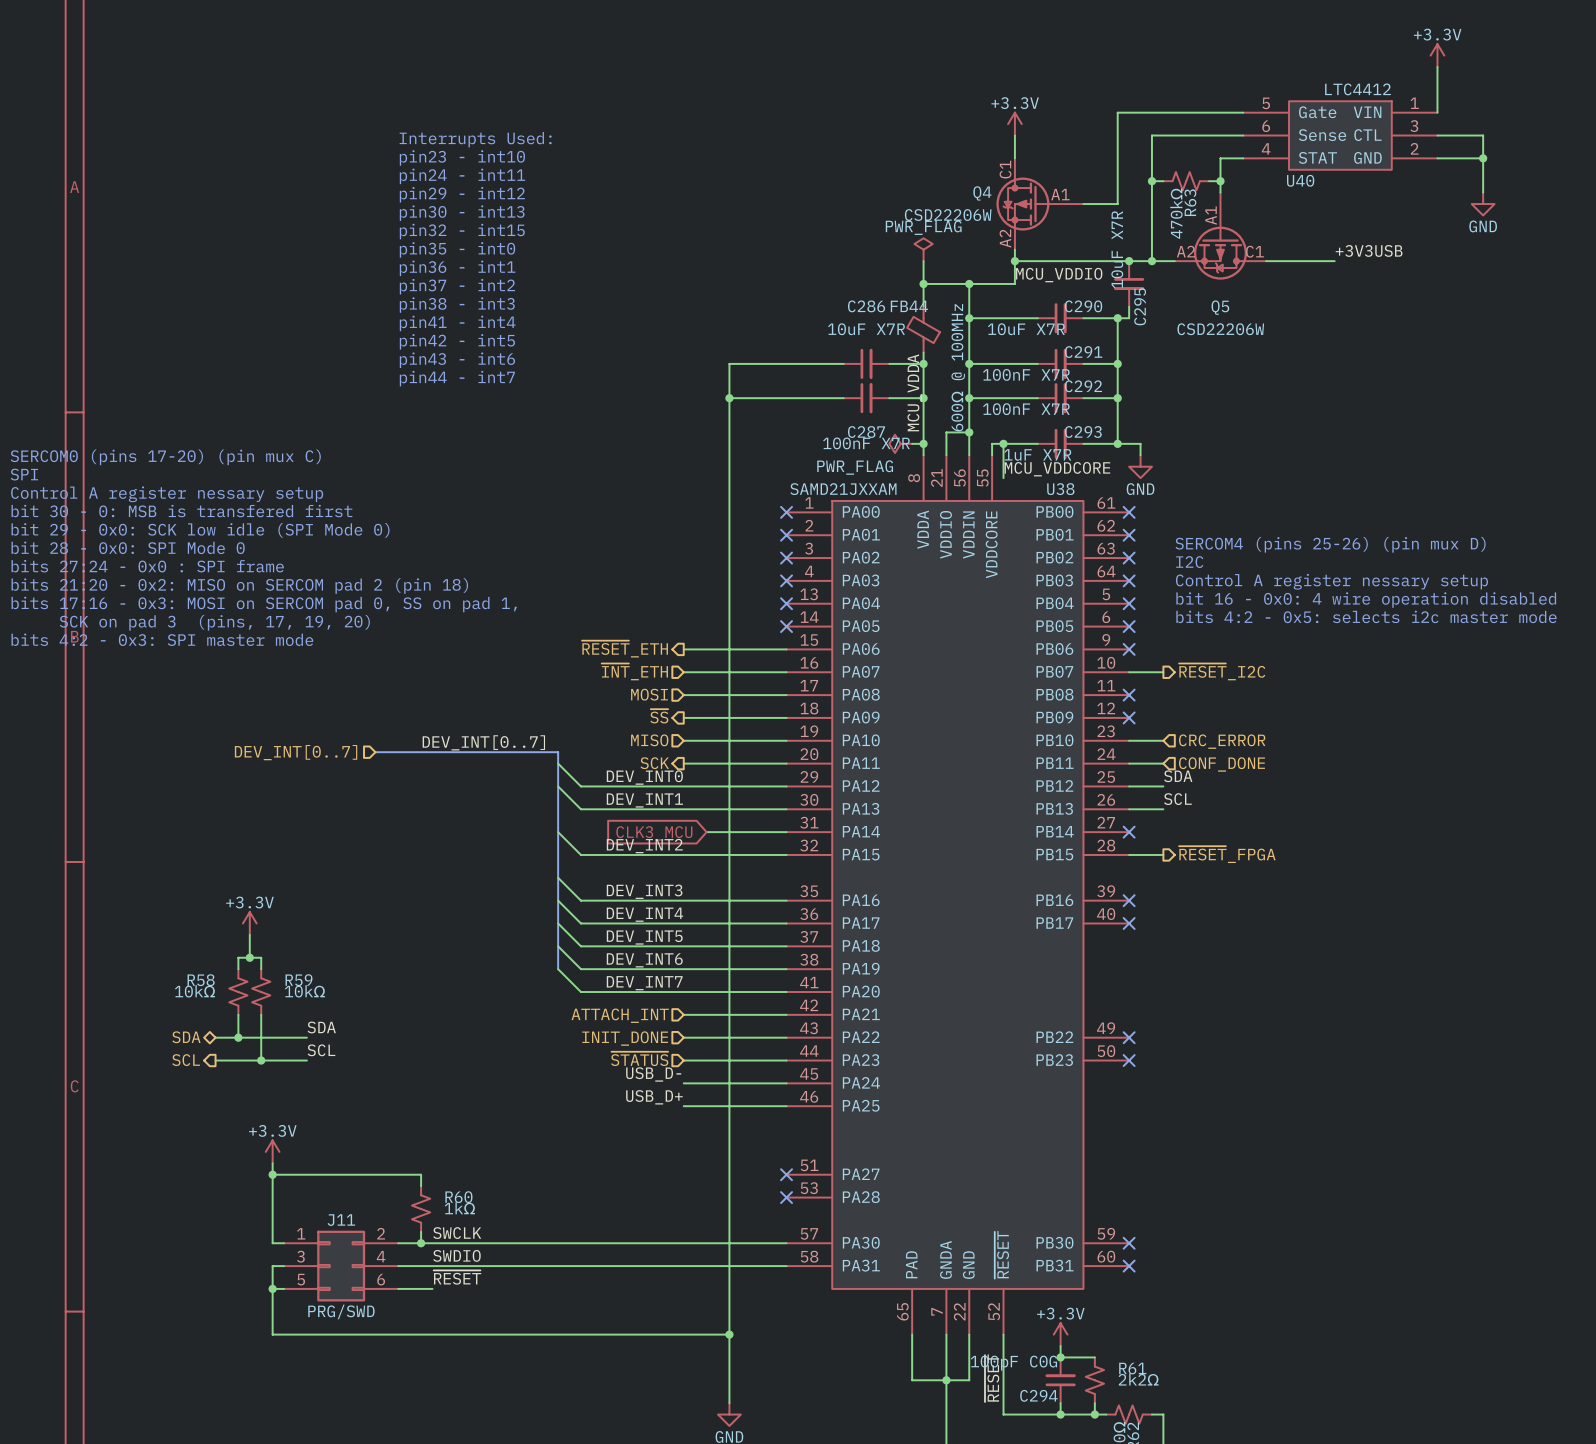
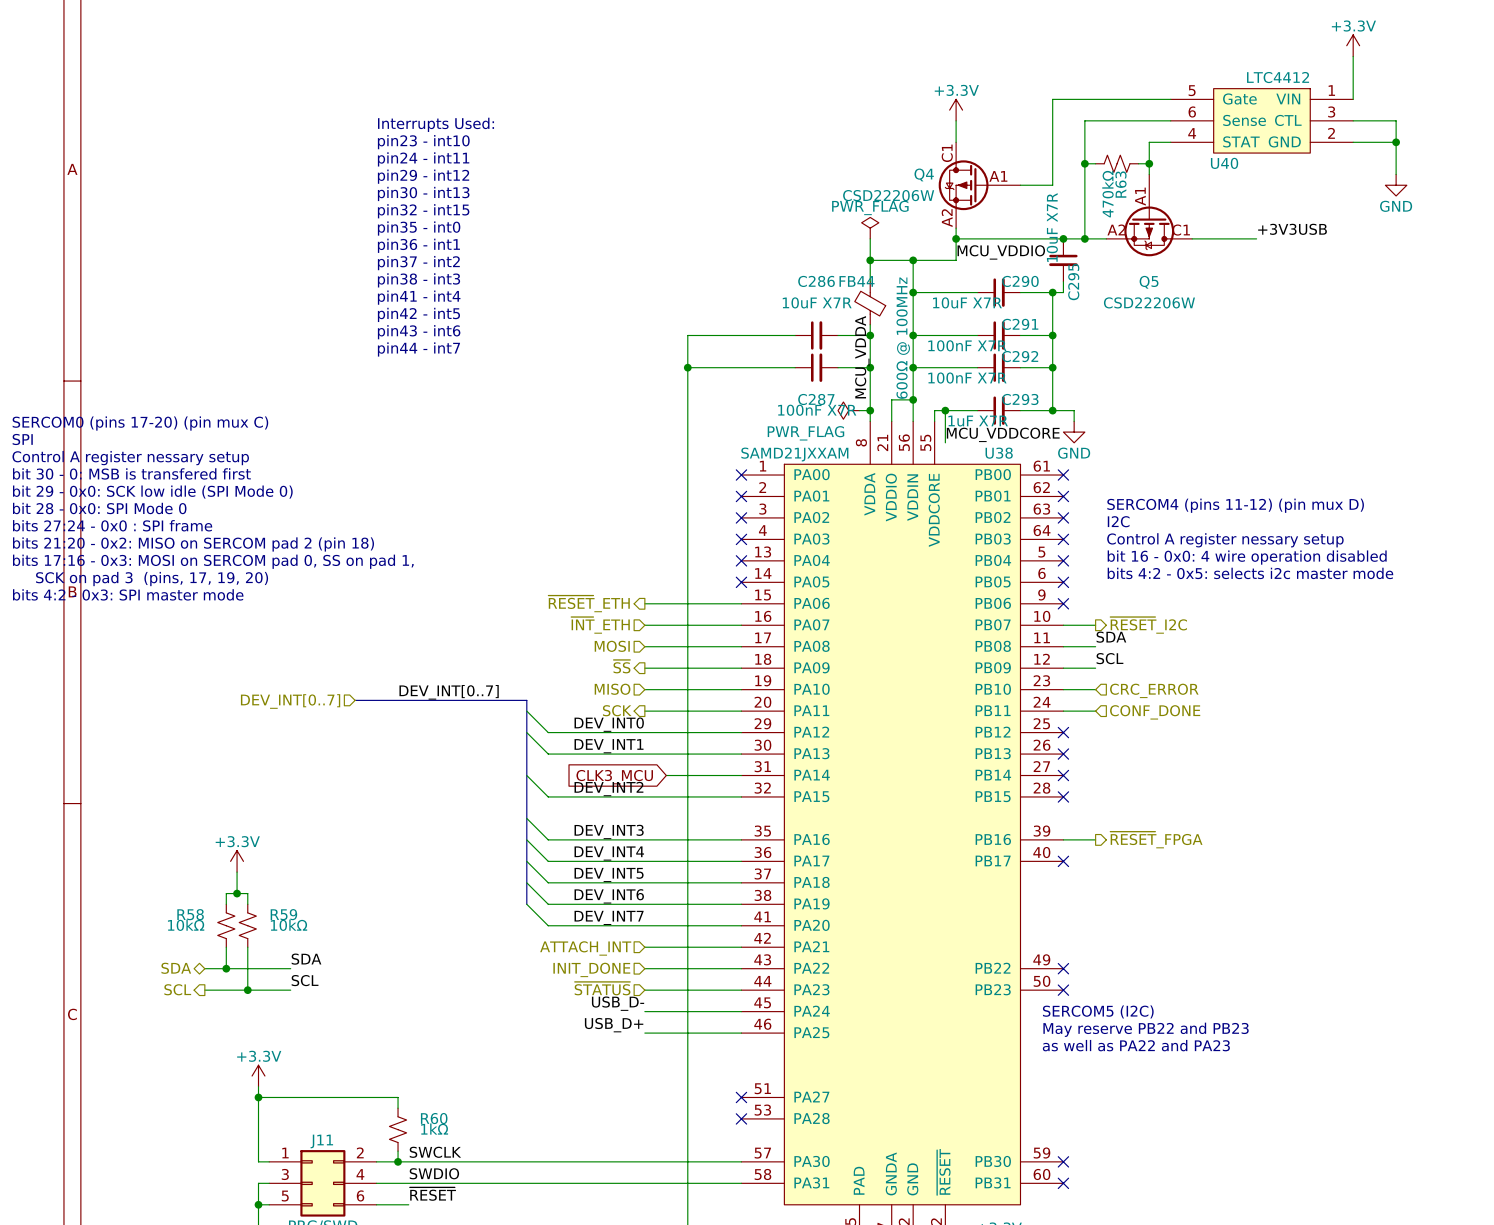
text: SERCOM4 (pins 25-26) (pin mux D) (1330, 544) -> SERCOM4 (pins 11-12) (pin mux D) (1235, 505)
no-connect mark: (1129, 695) -> none
no-connect mark: (1129, 717) -> none
label position: SDA (1178, 776) -> SDA (1111, 637)
wire: (1129, 786) (1163, 786) -> (1063, 646) (1095, 646)
no-connect mark: none -> (1063, 732)
label position: SCL (1177, 799) -> SCL (1109, 658)
wire: (1129, 809) (1163, 809) -> (1063, 668) (1095, 668)
no-connect mark: none -> (1063, 754)
wire: (1129, 854) (1163, 854) -> (1063, 839) (1095, 839)
no-connect mark: none -> (1063, 796)
hierarchical label position: ~{RESET}_FPGA (1227, 854) -> ~{RESET}_FPGA (1156, 840)
no-connect mark: (1129, 900) -> none
text: none -> SERCOM5 (I2C) (1098, 1011)
text: none -> May reserve PB22 and PB23 (1146, 1029)
text: none -> as well as PA22 and PA23 (1136, 1045)

